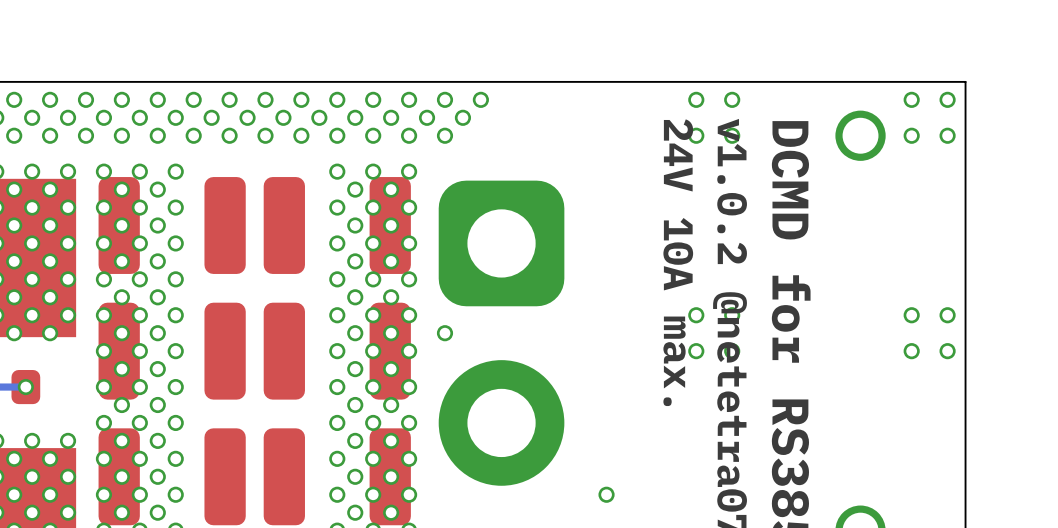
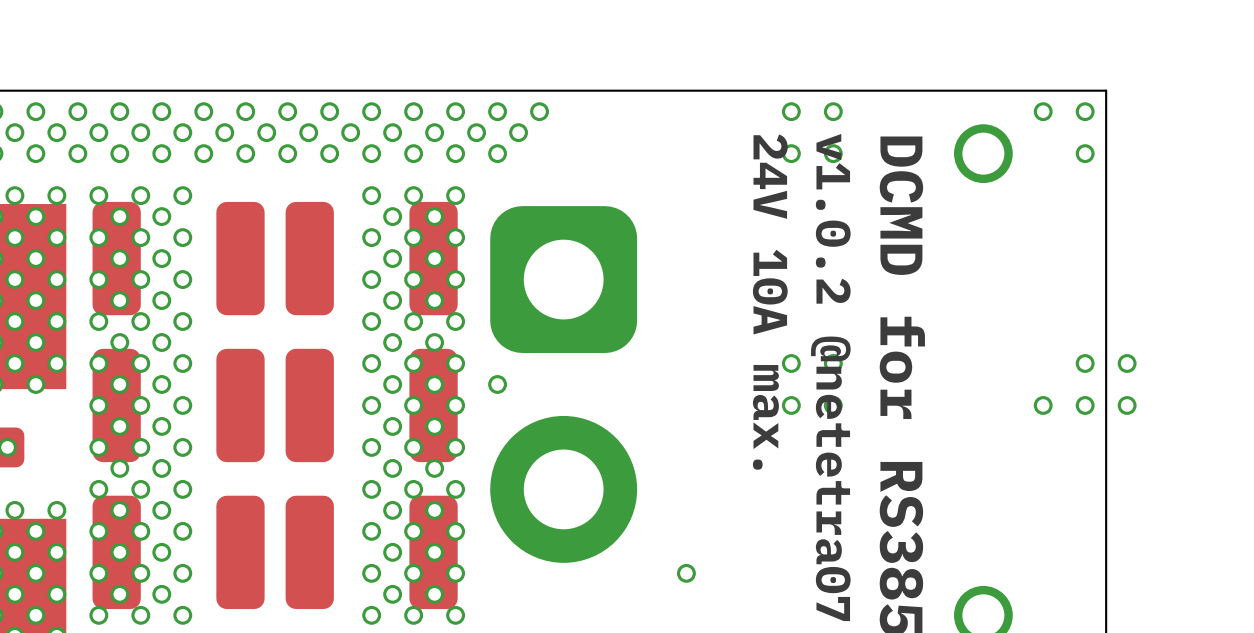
via: (911, 135) -> none
via: (911, 315) -> none
via: none -> (1127, 363)
via: none -> (1127, 405)

